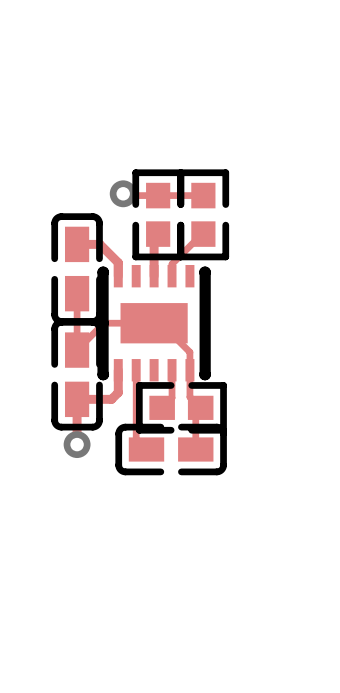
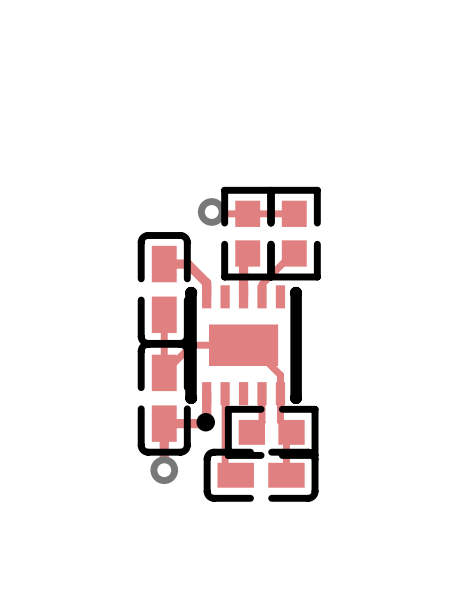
drawing: none -> [196, 413, 215, 432]

